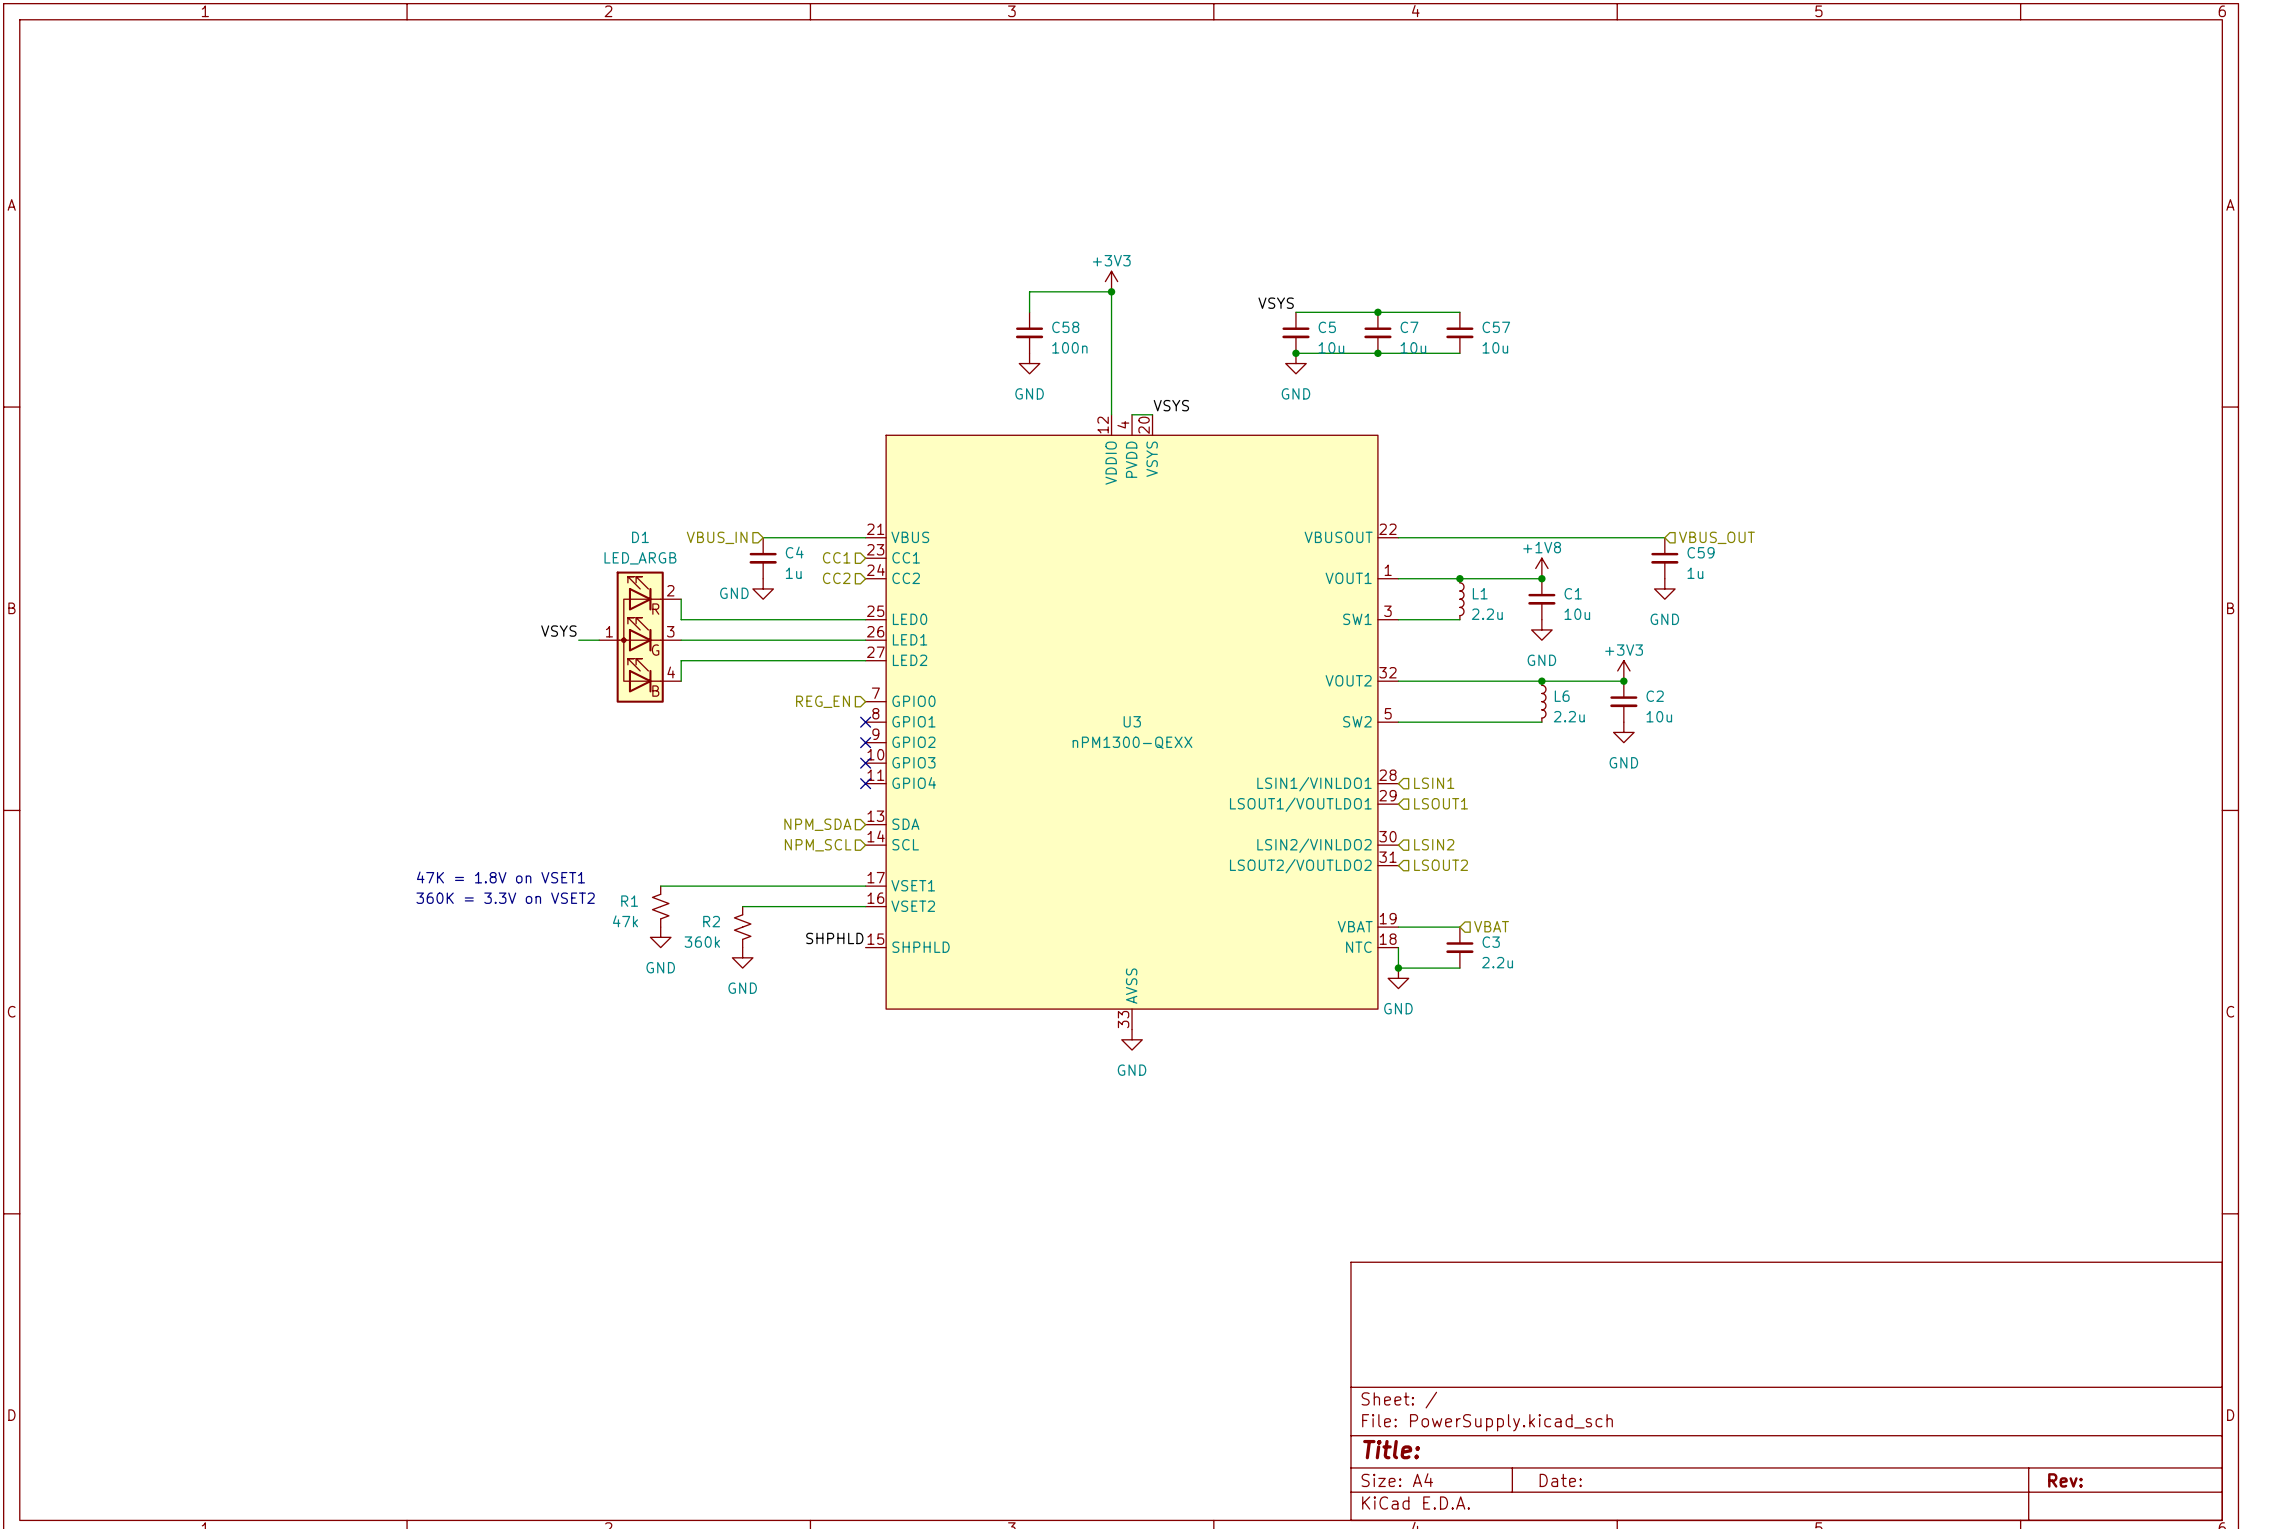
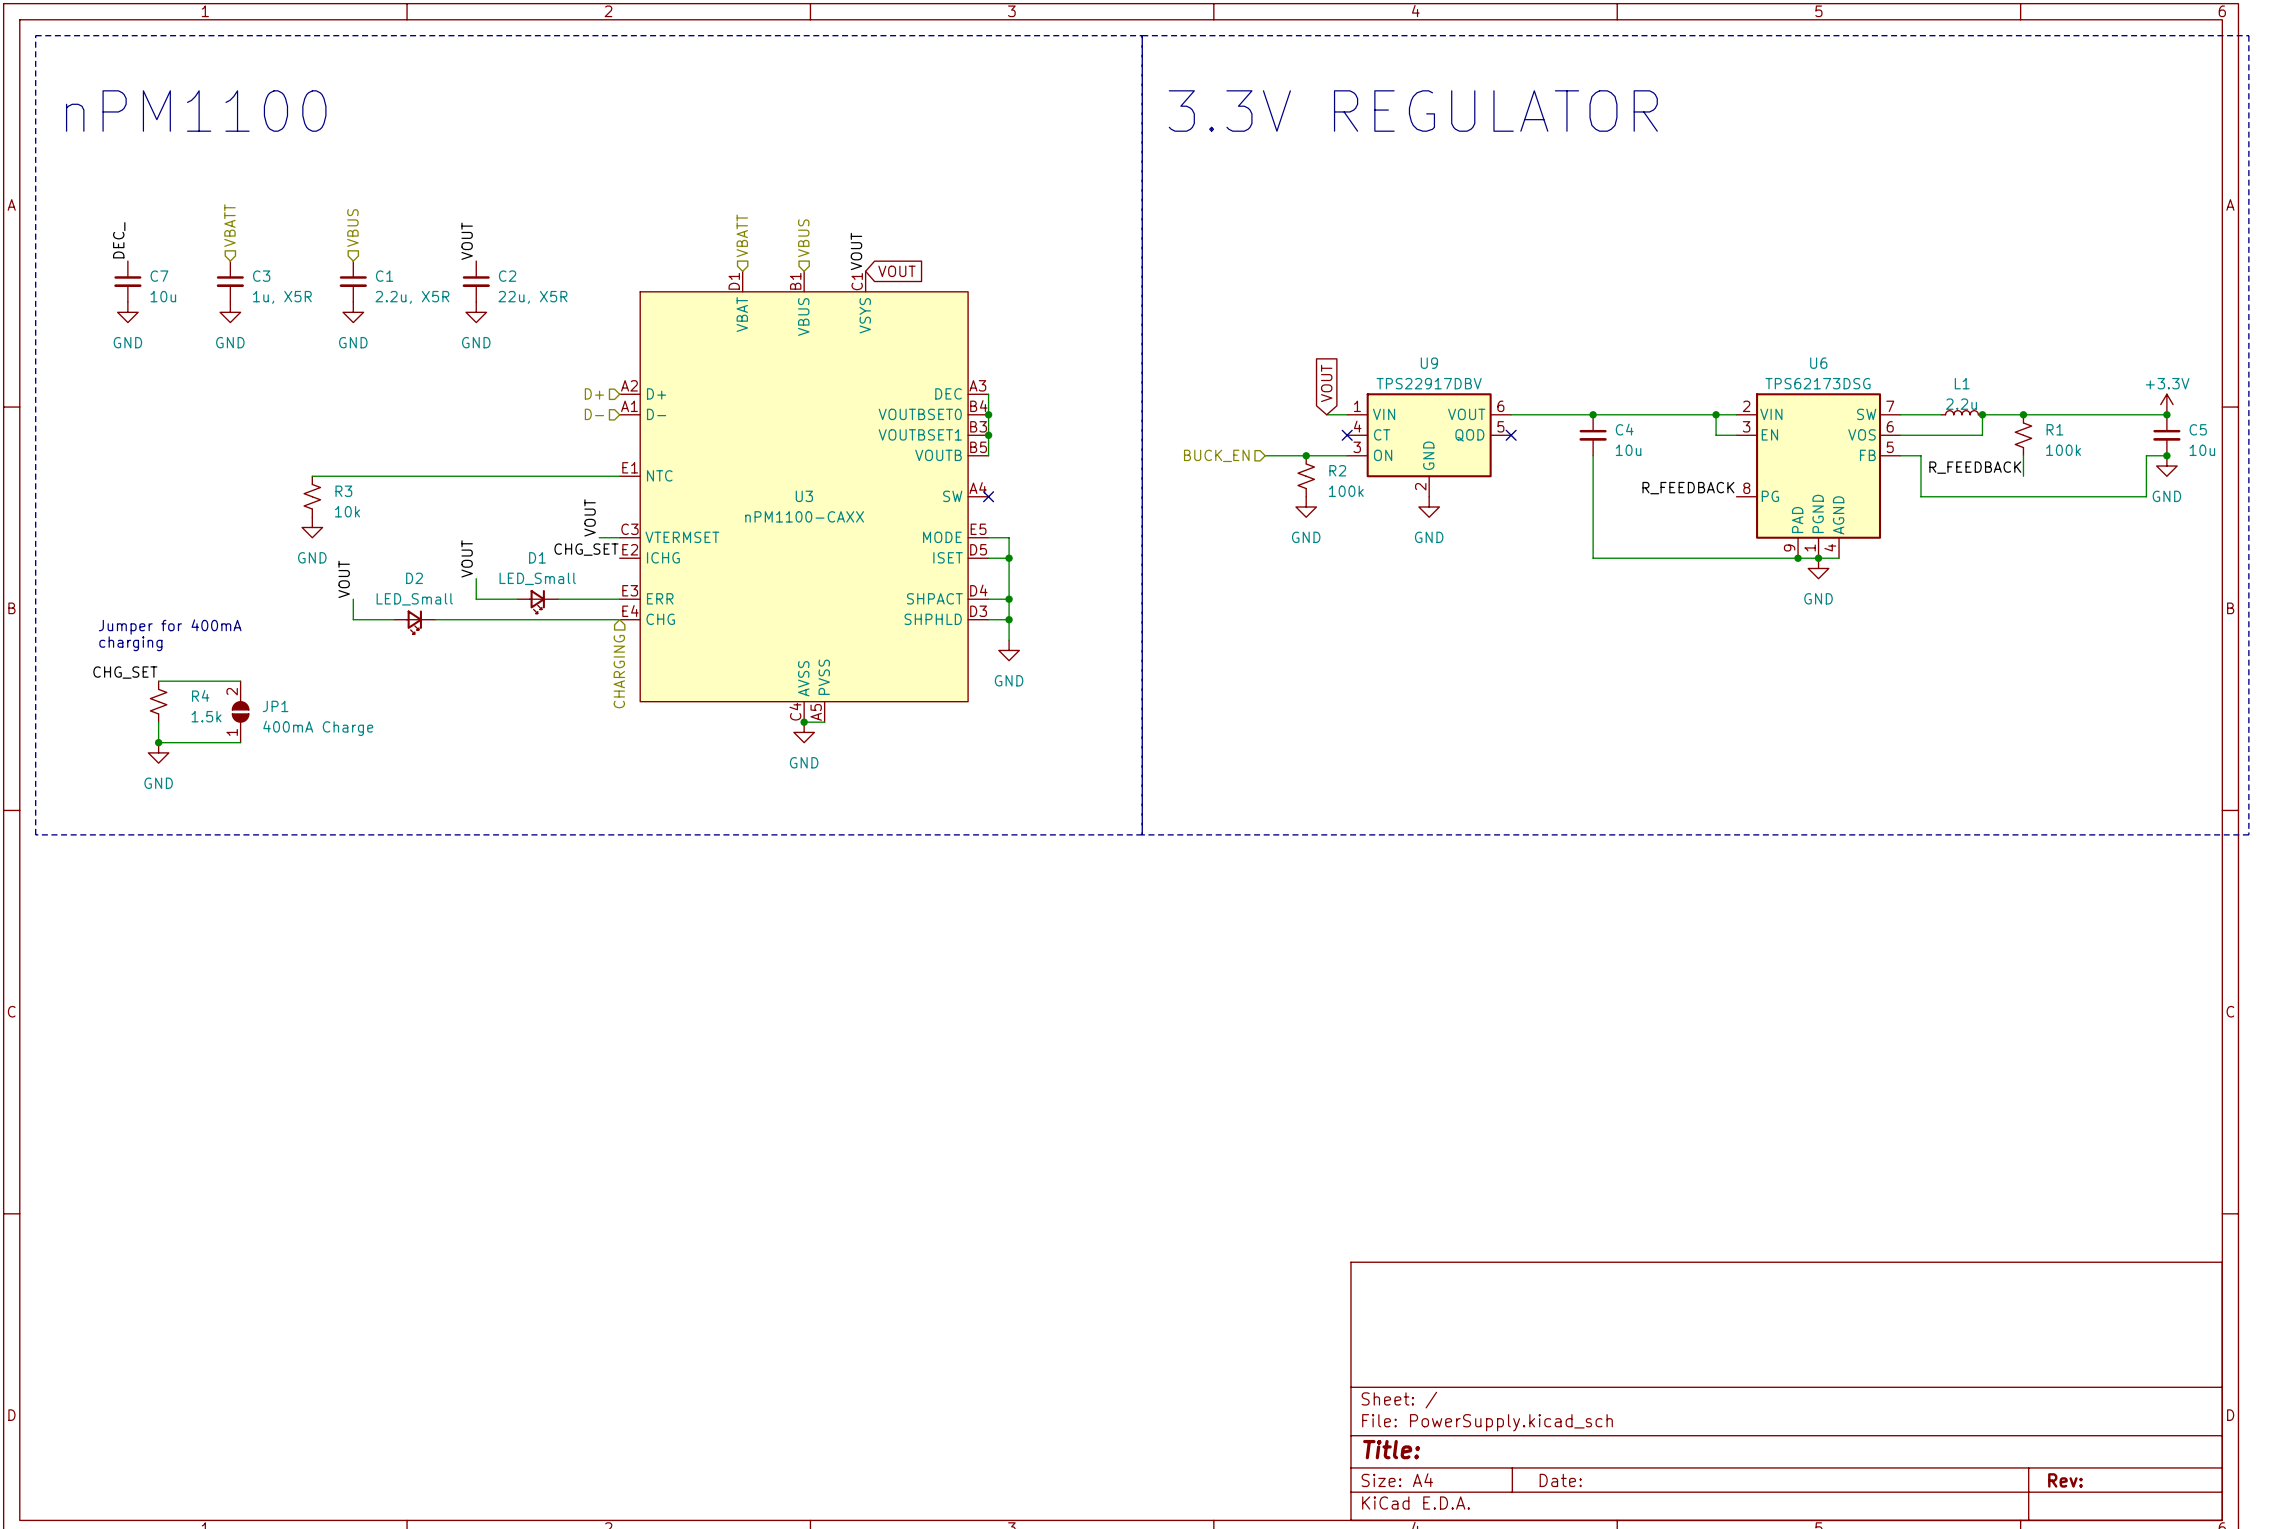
line: none -> (35, 35) (2248, 35) (2248, 834) (35, 834) (35, 35)
line: none -> (1142, 35) (1142, 834)
text: none -> nPM1100 (196, 111)
text: none -> 3.3V REGULATOR (1413, 111)
hierarchical label: none -> VBATT (229, 225)
hierarchical label: none -> VBUS (352, 227)
hierarchical label: none -> VBATT (742, 235)
hierarchical label: none -> VBUS (803, 238)
label: none -> DEC_ (119, 240)
label: none -> VOUT (467, 241)
label: none -> VOUT (856, 251)
global label: none -> VOUT (896, 271)
power symbol: +3V3 (1111, 281) -> none
junction: (1111, 291) -> none
label: VSYS (1276, 303) -> none
power symbol: none -> GND (127, 312)
power symbol: none -> GND (230, 312)
power symbol: none -> GND (353, 312)
power symbol: none -> GND (476, 312)
wire: (1029, 312) (1029, 291) (1111, 291) (1111, 414) -> none
wire: (1295, 312) (1459, 312) -> none
junction: (1377, 312) -> none
C58: 100n (1029, 332) -> none
C5 position: (1295, 332) -> (2166, 435)
C7 position: (1377, 332) -> (127, 281)
C57: 10u (1459, 332) -> none
wire: (1295, 353) (1459, 353) -> none
junction: (1295, 353) -> none
junction: (1377, 353) -> none
power symbol: GND (1029, 363) -> none
power symbol: GND (1295, 363) -> none
global label: none -> VOUT (1326, 383)
hierarchical label: none -> D+ (594, 393)
wire: none -> (988, 394) (988, 455)
power symbol: none -> +3.3V (2166, 404)
label: VSYS (1171, 405) -> none
hierarchical label: none -> D- (594, 414)
U3 symbol: [865, 414, 1399, 1030] -> [619, 271, 989, 723]
junction: none -> (988, 414)
wire: (1132, 414) (1152, 414) -> (1326, 414) (1347, 414)
wire: none -> (1511, 414) (1736, 414)
junction: none -> (1593, 414)
wire: none -> (1716, 414) (1716, 435) (1736, 435)
junction: none -> (1716, 414)
wire: none -> (1900, 414) (1941, 414)
junction: none -> (1982, 414)
junction: none -> (2023, 414)
wire: none -> (2166, 414) (1982, 414) (1982, 435) (1900, 435)
junction: none -> (2166, 414)
junction: none -> (988, 435)
no-connect mark: none -> (1347, 435)
no-connect mark: none -> (1511, 435)
U9: none -> TPS22917DBV (1429, 445)
hierarchical label: none -> BUCK_EN (1216, 455)
junction: none -> (1306, 455)
wire: none -> (1593, 455) (1593, 558) (1839, 558)
wire: none -> (1900, 455) (1920, 455) (1920, 496) (2146, 496) (2146, 455) (2166, 455)
wire: none -> (2023, 455) (2023, 476)
junction: none -> (2166, 455)
power symbol: none -> GND (2166, 466)
label: none -> R_FEEDBACK (1975, 467)
U6: none -> TPS62173DSG (1818, 475)
wire: none -> (312, 476) (619, 476)
label: none -> R_FEEDBACK (1688, 488)
R3: none -> 10k (312, 496)
no-connect mark: none -> (988, 496)
power symbol: none -> GND (1306, 507)
power symbol: none -> GND (1429, 507)
label: none -> VOUT (590, 517)
power symbol: none -> GND (312, 527)
D1 name position: D1 (640, 537) -> D1 (537, 557)
hierarchical label: VBUS_IN (717, 537) -> none
wire: (1398, 537) (1664, 537) -> none
hierarchical label: VBUS_OUT (1716, 537) -> none
label: none -> CHG_SET (586, 549)
hierarchical label: CC1 (836, 557) -> none
label: none -> VOUT (467, 558)
D1 value: LED_ARGB (640, 558) -> LED_Small (537, 578)
C4 position: (763, 558) -> (1593, 435)
junction: none -> (1009, 558)
C59: 1u (1664, 558) -> none
junction: none -> (1798, 558)
junction: none -> (1818, 558)
power symbol: +1V8 (1541, 568) -> none
power symbol: none -> GND (1818, 568)
D1 symbol: [599, 571, 682, 703] -> [517, 589, 559, 614]
C4 value: 1u (793, 573) -> 10u (1628, 450)
wire: none -> (476, 578) (476, 599) (517, 599)
hierarchical label: CC2 (836, 578) -> none
wire: (1398, 578) (1541, 578) -> none
junction: (1459, 578) -> none
junction: (1541, 578) -> none
label: none -> VOUT (344, 579)
power symbol: GND (763, 588) -> none
power symbol: GND (1664, 588) -> none
wire: none -> (353, 599) (353, 619) (394, 619)
wire: none -> (558, 599) (619, 599)
junction: none -> (1009, 599)
L1 rotation: 0° (1461, 599) -> 90° counterclockwise (1961, 412)
L1 position: (1461, 599) -> (1961, 412)
C1 position: (1541, 599) -> (353, 281)
L1 value position: 2.2u (1487, 614) -> 2.2u (1961, 404)
C1 value: 10u (1577, 614) -> 2.2u, X5R (412, 297)
wire: none -> (435, 619) (619, 619)
junction: none -> (1009, 619)
wire: (1398, 619) (1459, 619) -> none
D2: none -> LED_Small (414, 622)
text: none -> Jumper for 400mA (170, 627)
power symbol: GND (1541, 629) -> none
label: VSYS (558, 631) -> none
wire: (578, 640) (599, 640) -> (599, 537) (619, 537)
text: none -> charging (130, 643)
power symbol: none -> GND (1009, 650)
power symbol: +3V3 (1623, 670) -> none
hierarchical label: none -> CHARGING (619, 671)
label: none -> CHG_SET (125, 672)
wire: none -> (158, 681) (240, 681)
wire: (1398, 681) (1623, 681) -> none
junction: (1541, 681) -> none
junction: (1623, 681) -> none
R4: none -> 1.5k (158, 701)
hierarchical label: REG_EN (823, 701) -> none
L6: 2.2u (1543, 701) -> none
C2 position: (1623, 701) -> (476, 281)
JP1: none -> 400mA Charge (240, 711)
C2 value: 10u (1659, 716) -> 22u, X5R (532, 297)
wire: none -> (158, 722) (158, 742) (240, 742)
wire: none -> (804, 722) (824, 722)
junction: none -> (804, 722)
no-connect mark: (865, 722) -> none
wire: (1398, 722) (1541, 722) -> none
power symbol: none -> GND (804, 732)
power symbol: GND (1623, 732) -> none
junction: none -> (158, 742)
no-connect mark: (865, 742) -> none
U3 value: nPM1300-QEXX (1132, 742) -> nPM1100-CAXX (804, 516)
power symbol: none -> GND (158, 752)
no-connect mark: (865, 763) -> none
no-connect mark: (865, 783) -> none
hierarchical label: LSIN1 (1434, 783) -> none
hierarchical label: LSOUT1 (1441, 803) -> none
hierarchical label: NPM_SDA (817, 824) -> none
hierarchical label: LSIN2 (1434, 844) -> none
hierarchical label: NPM_SCL (818, 845) -> none
hierarchical label: LSOUT2 (1441, 865) -> none
text: 47K = 1.8V on VSET1 (500, 877) -> none
wire: (660, 886) (865, 886) -> none
text: 360K = 3.3V on VSET2 (505, 898) -> none
R1 flip: as is (660, 906) -> left-right (2023, 435)
R1 position: (660, 906) -> (2023, 435)
wire: (742, 906) (865, 906) -> none
R1 value: 47k (625, 921) -> 100k (2063, 450)
hierarchical label: VBAT (1491, 926) -> none
R2 flip: as is (742, 927) -> left-right (1306, 476)
R2 position: (742, 927) -> (1306, 476)
wire: (1398, 927) (1459, 927) -> none
power symbol: GND (660, 937) -> none
label: SHPHLD (834, 938) -> none
R2 value: 360k (702, 942) -> 100k (1346, 491)
wire: (1398, 947) (1398, 968) (1459, 968) -> none
C3 position: (1459, 947) -> (230, 281)
power symbol: GND (742, 957) -> none
C3 value: 2.2u (1497, 962) -> 1u, X5R (282, 297)
junction: (1398, 968) -> none
power symbol: GND (1398, 978) -> none
power symbol: GND (1132, 1039) -> none

